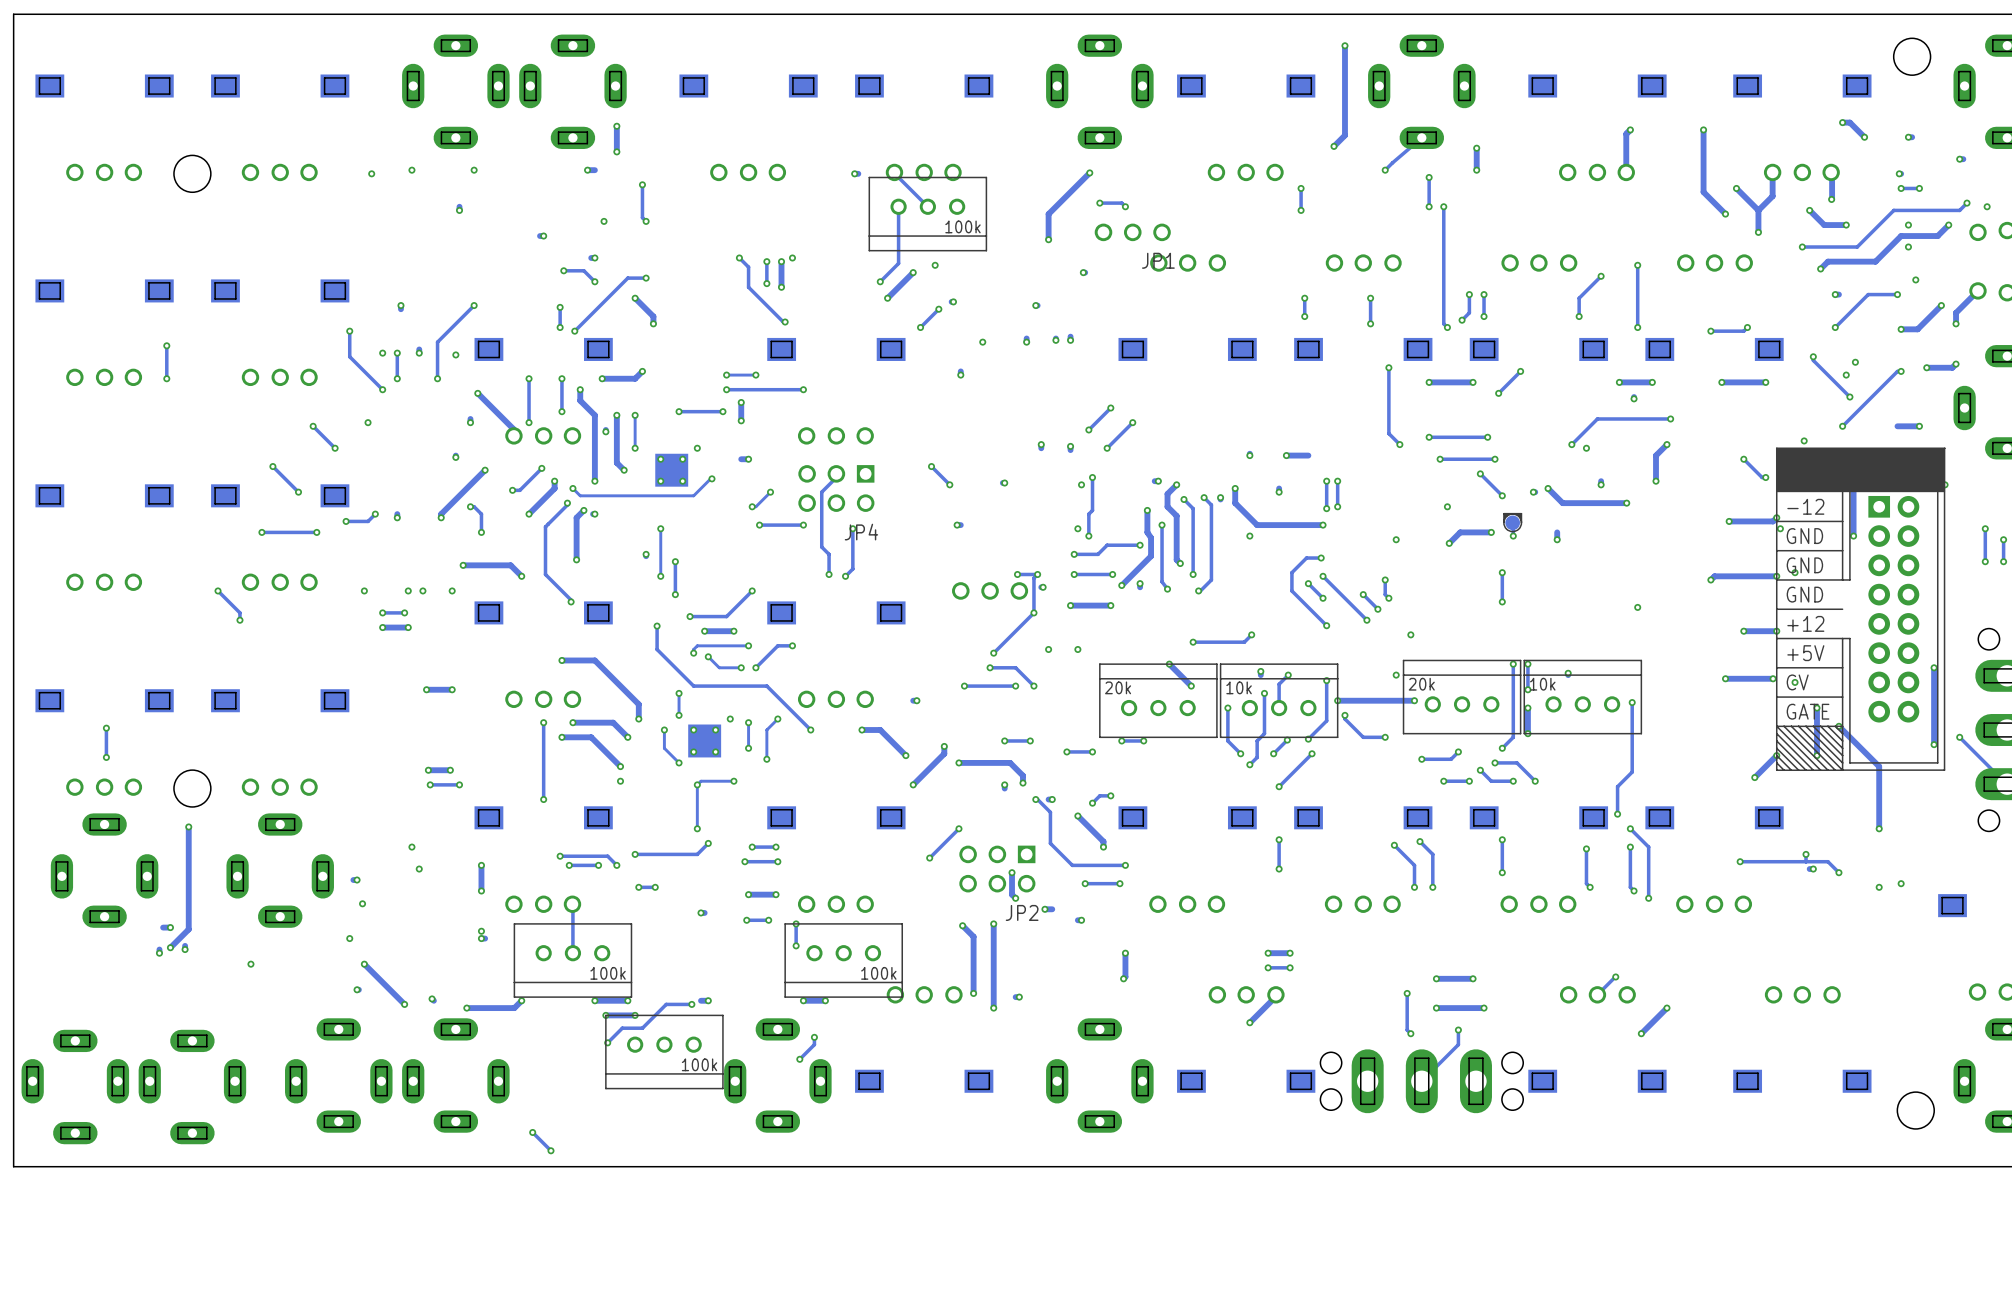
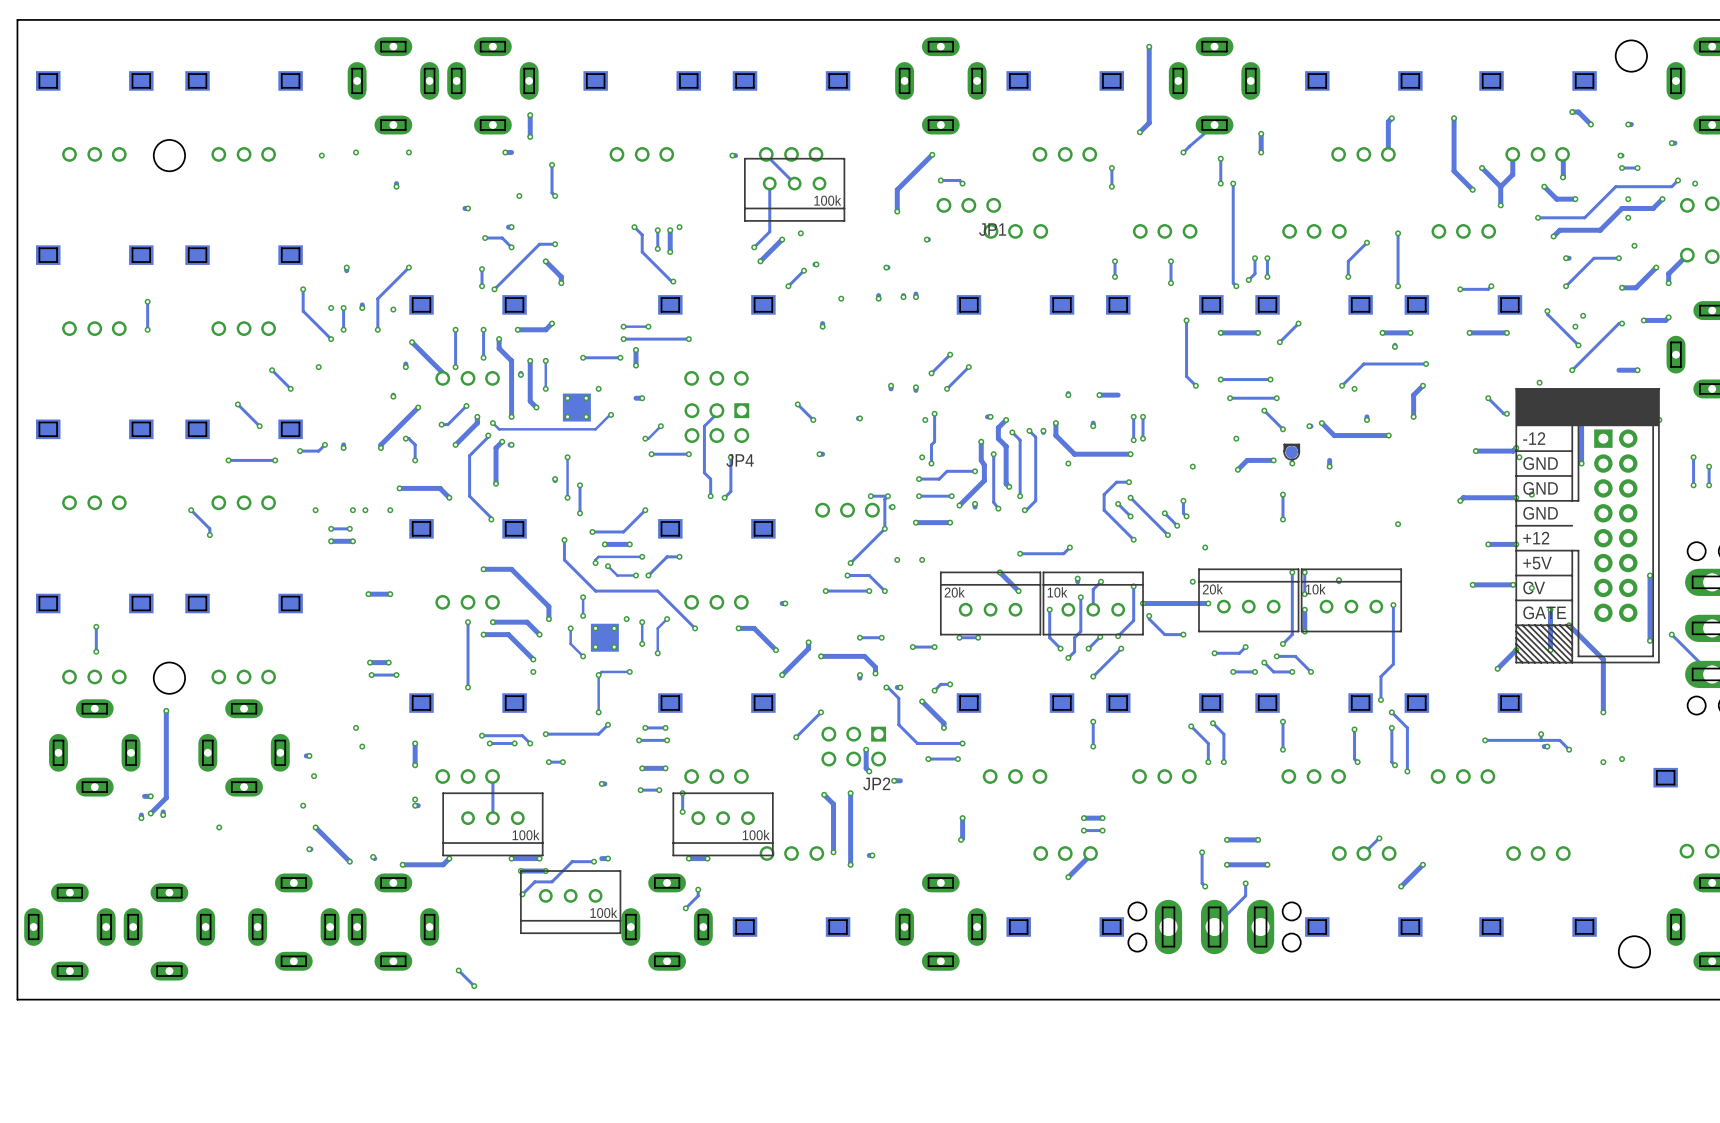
track: (1081, 920) (1077, 920) -> none
via: (1081, 920) -> none

